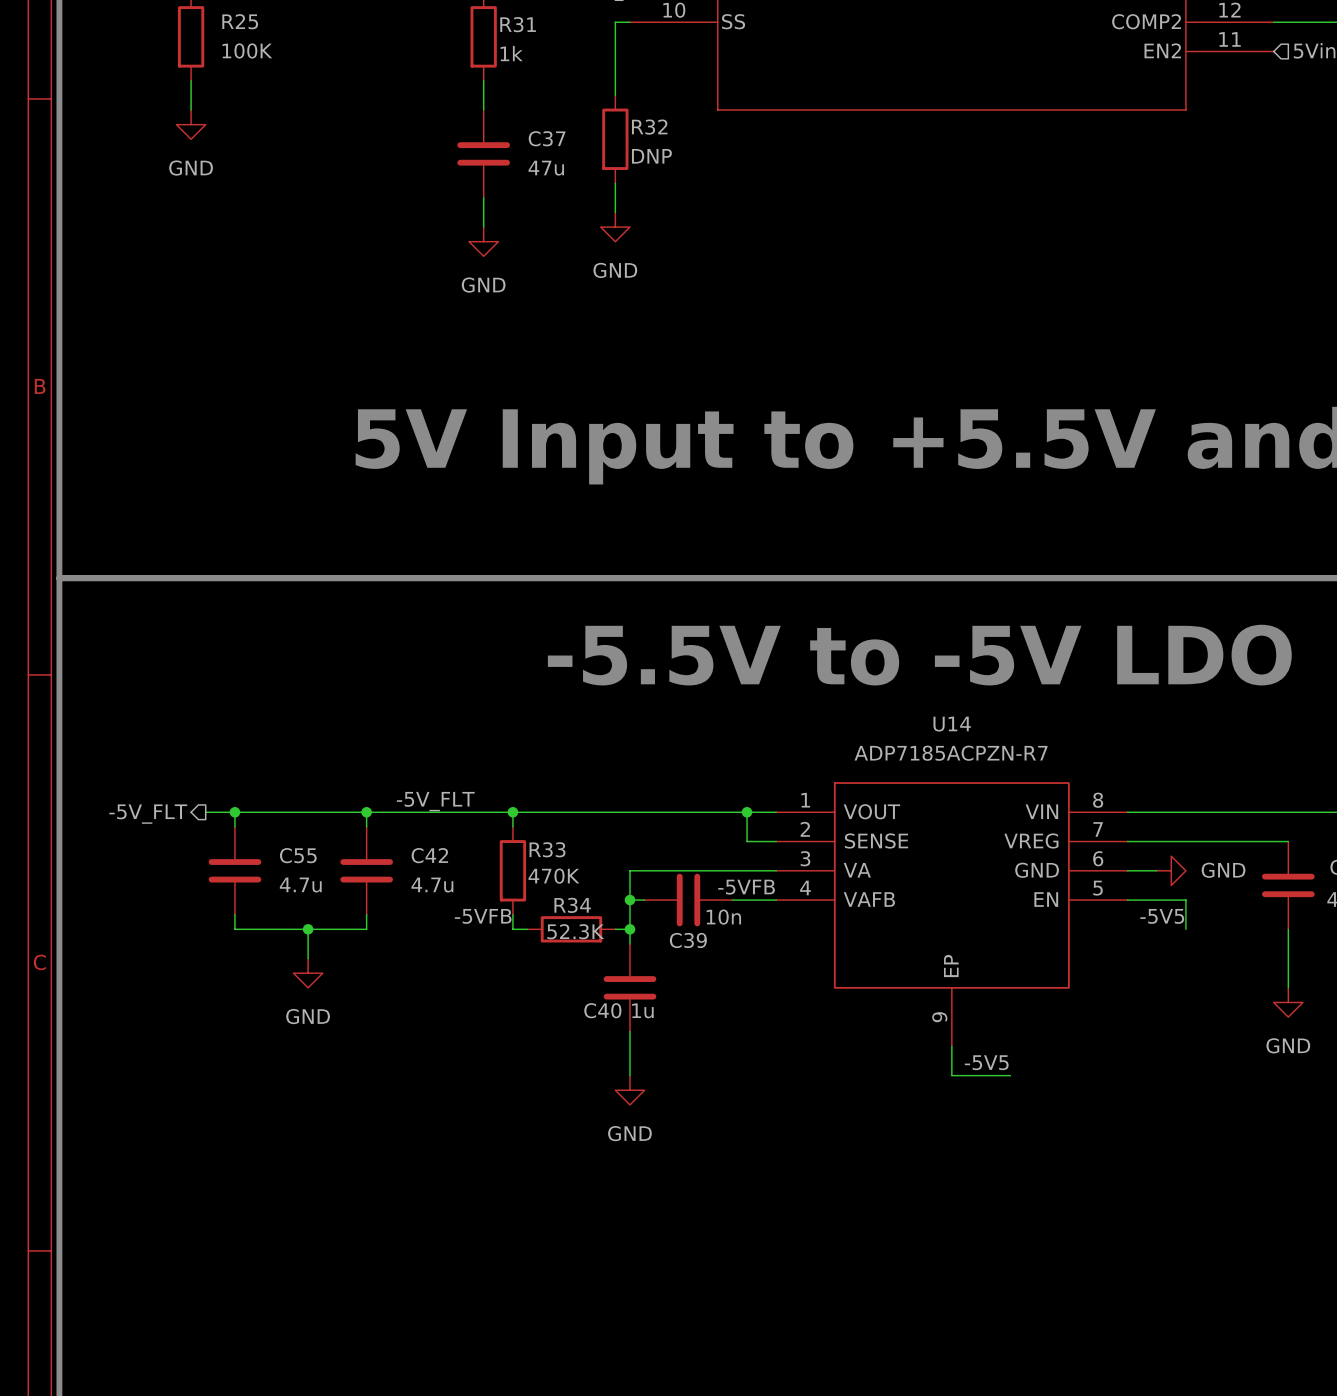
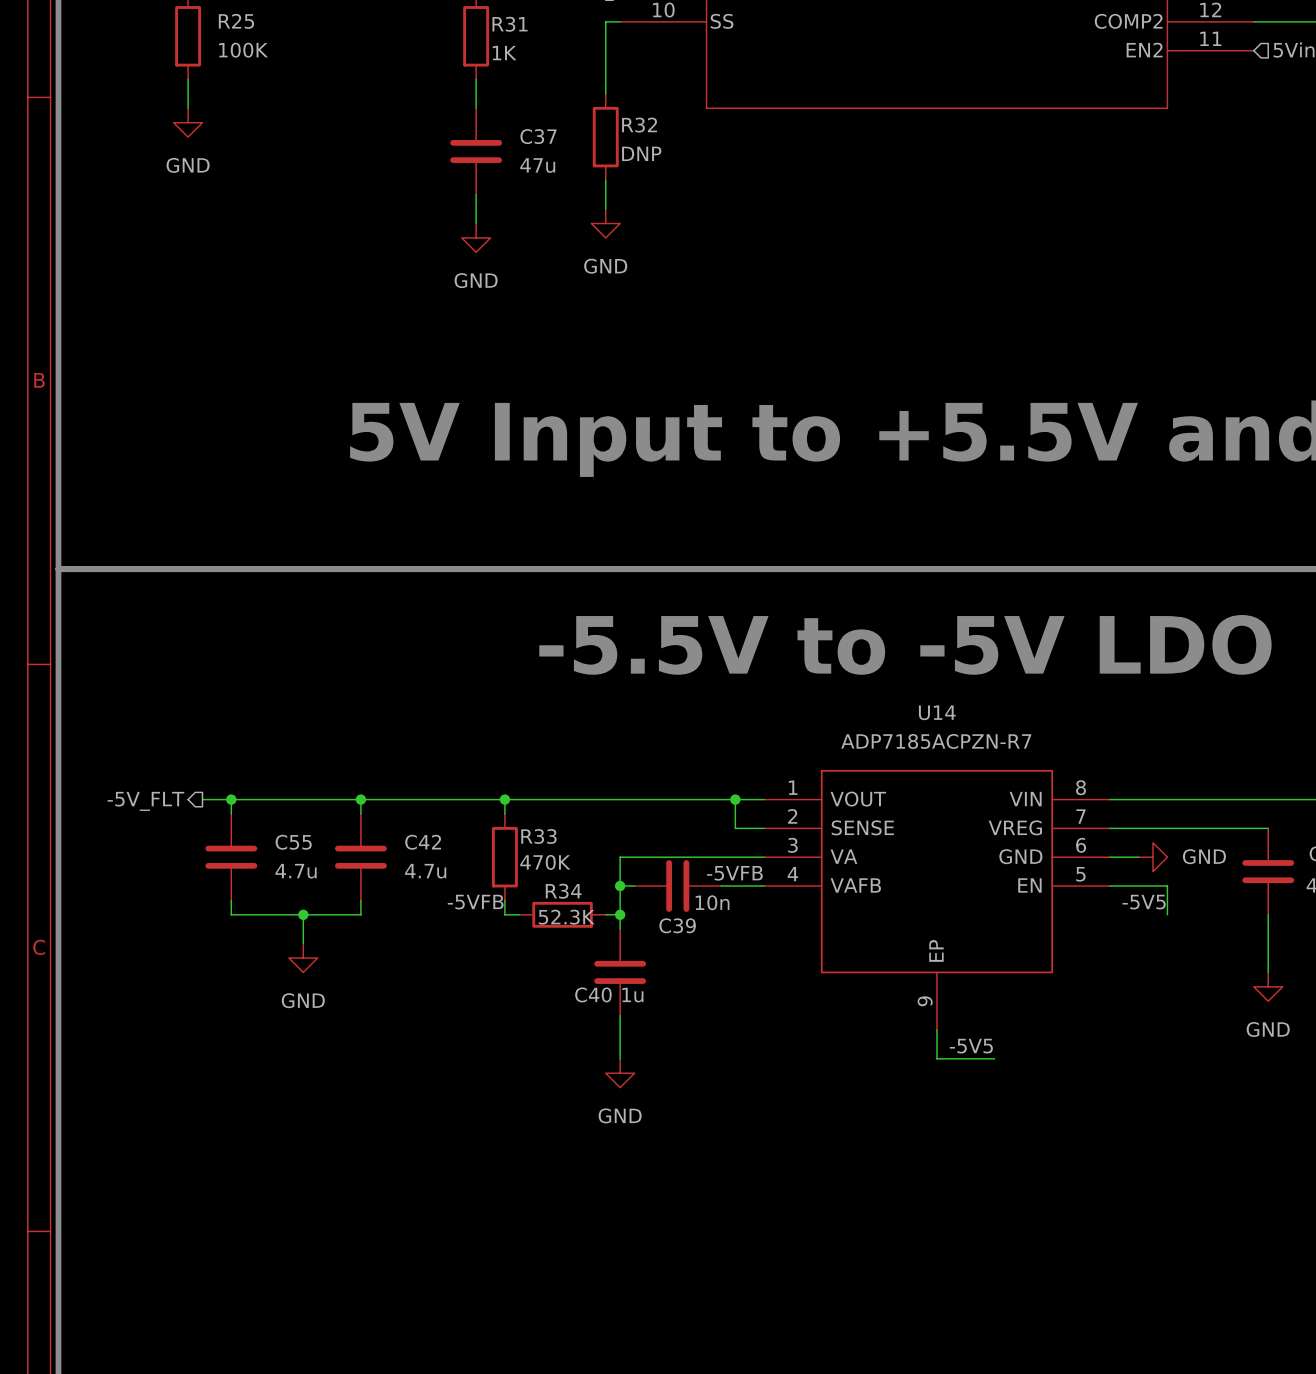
R31 value: 1k (511, 53) -> 1K (504, 53)
label: -5V_FLT (435, 801) -> none

